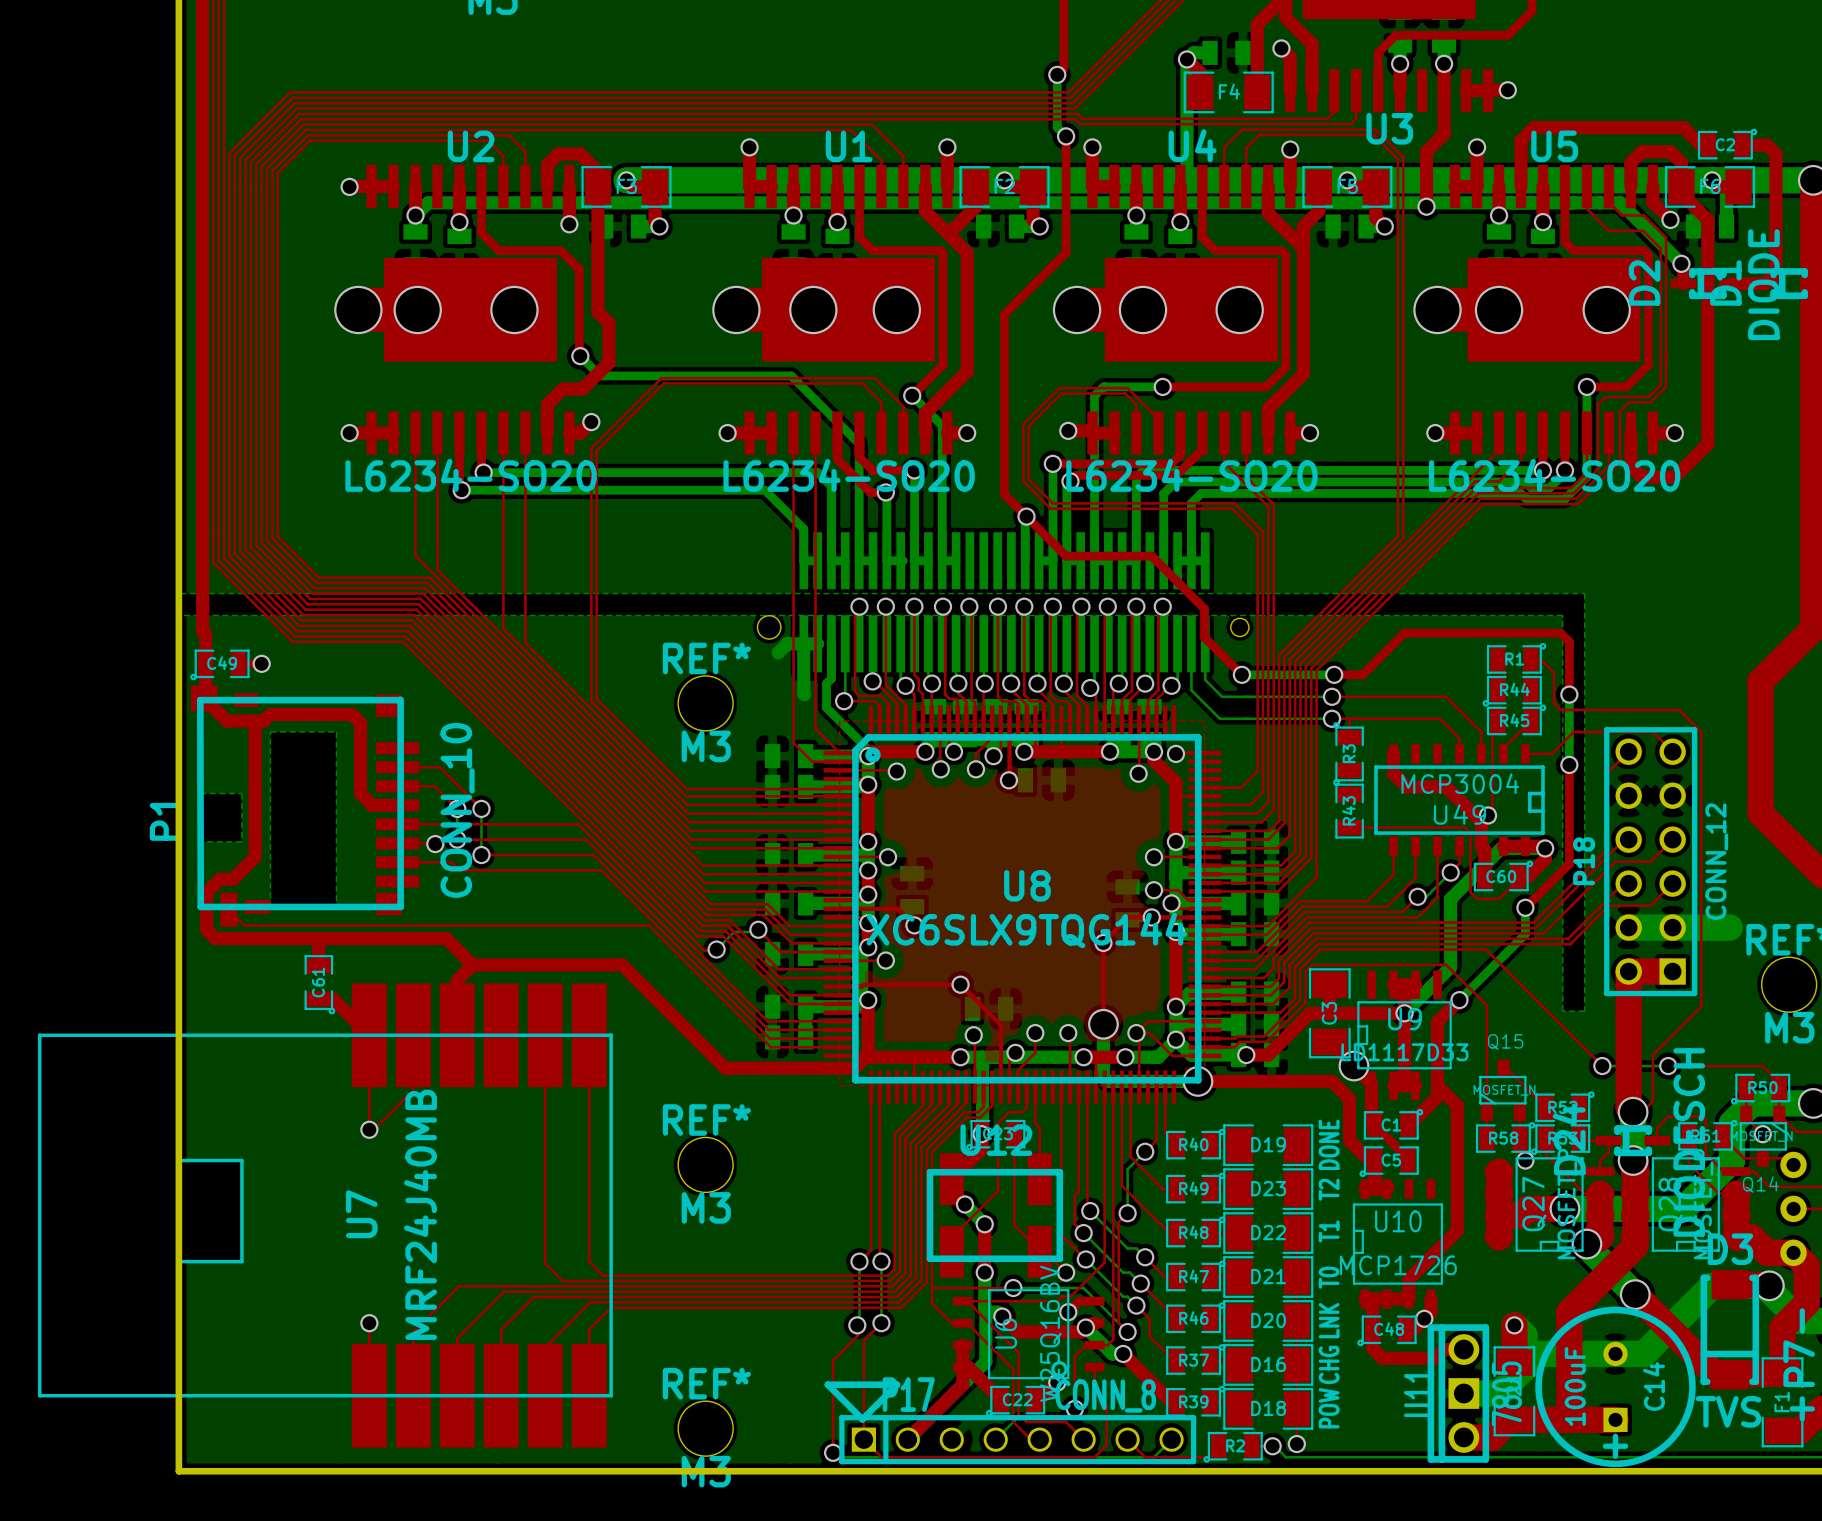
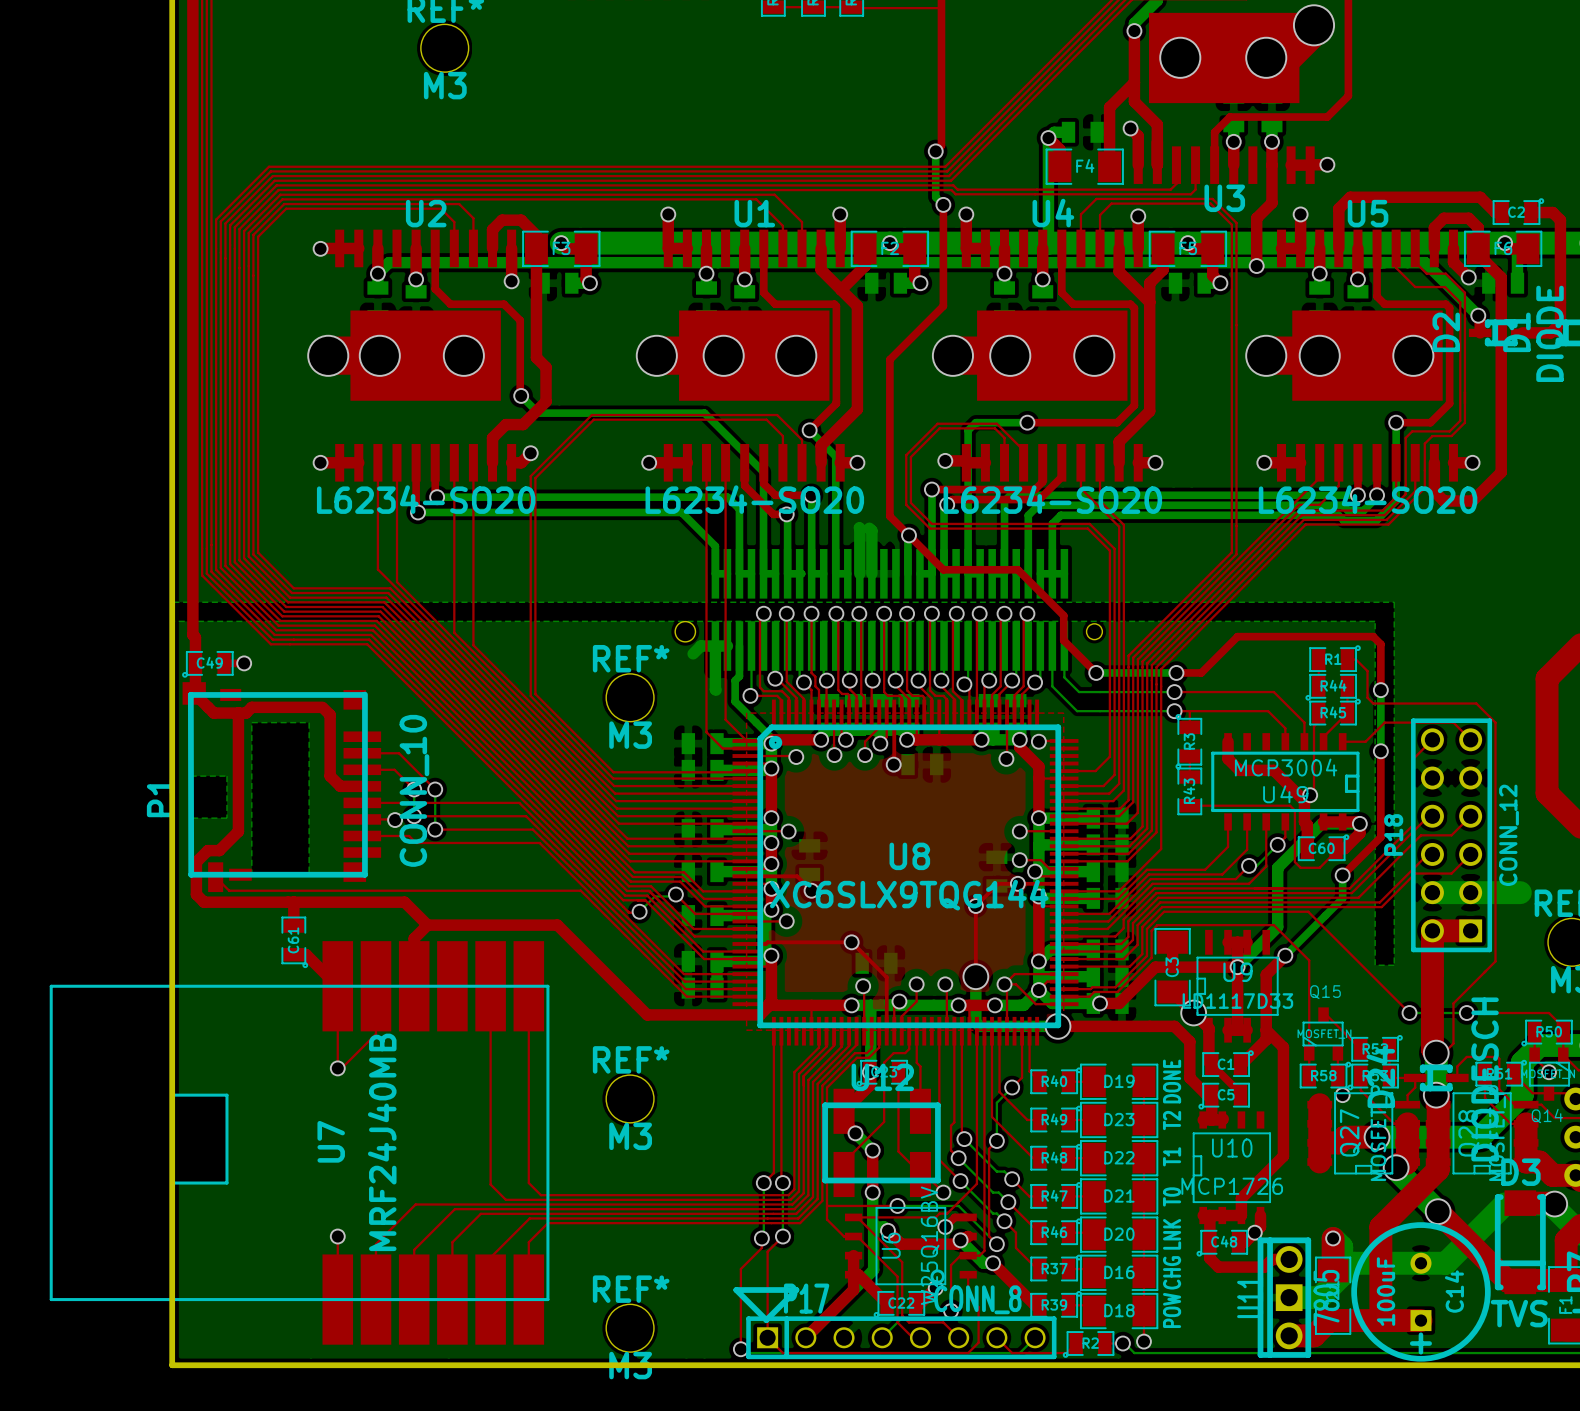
bottom track: none -> (859, 527) (859, 573)
bottom track: none -> (869, 528) (871, 530) (871, 573)

